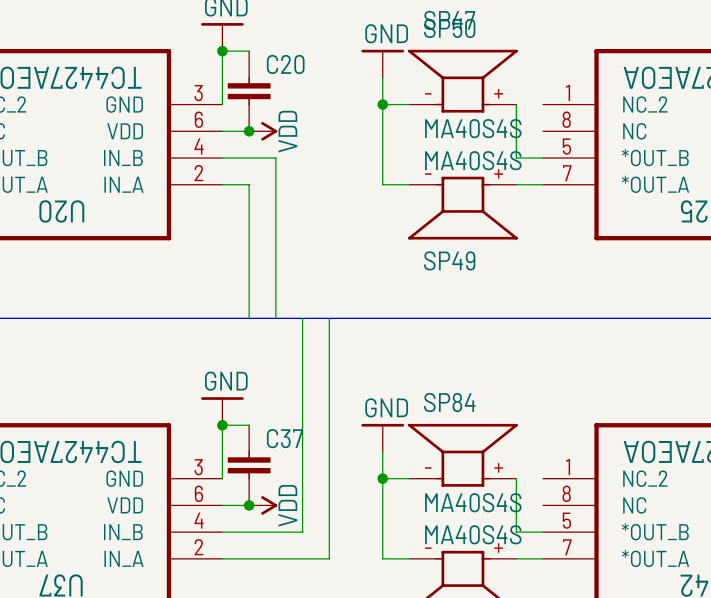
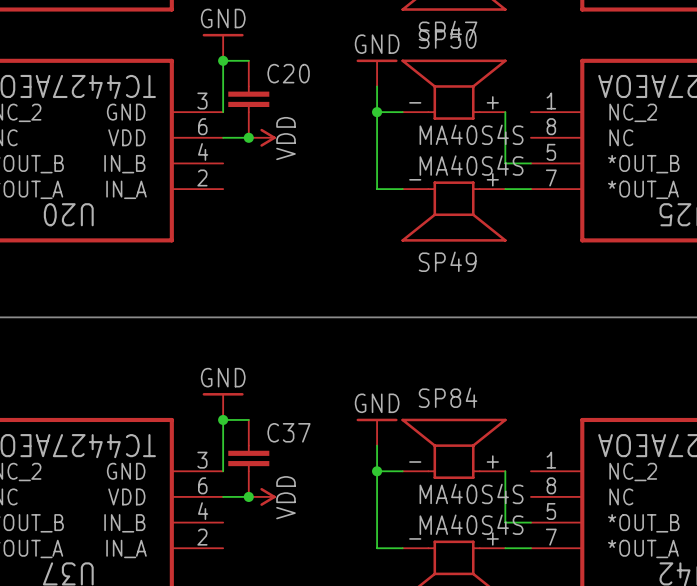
wire: (222, 158) (275, 158) (275, 318) -> none
wire: (222, 184) (249, 184) (249, 318) -> none
wire: (302, 318) (302, 532) (222, 532) -> none
wire: (329, 318) (329, 558) (222, 558) -> none

